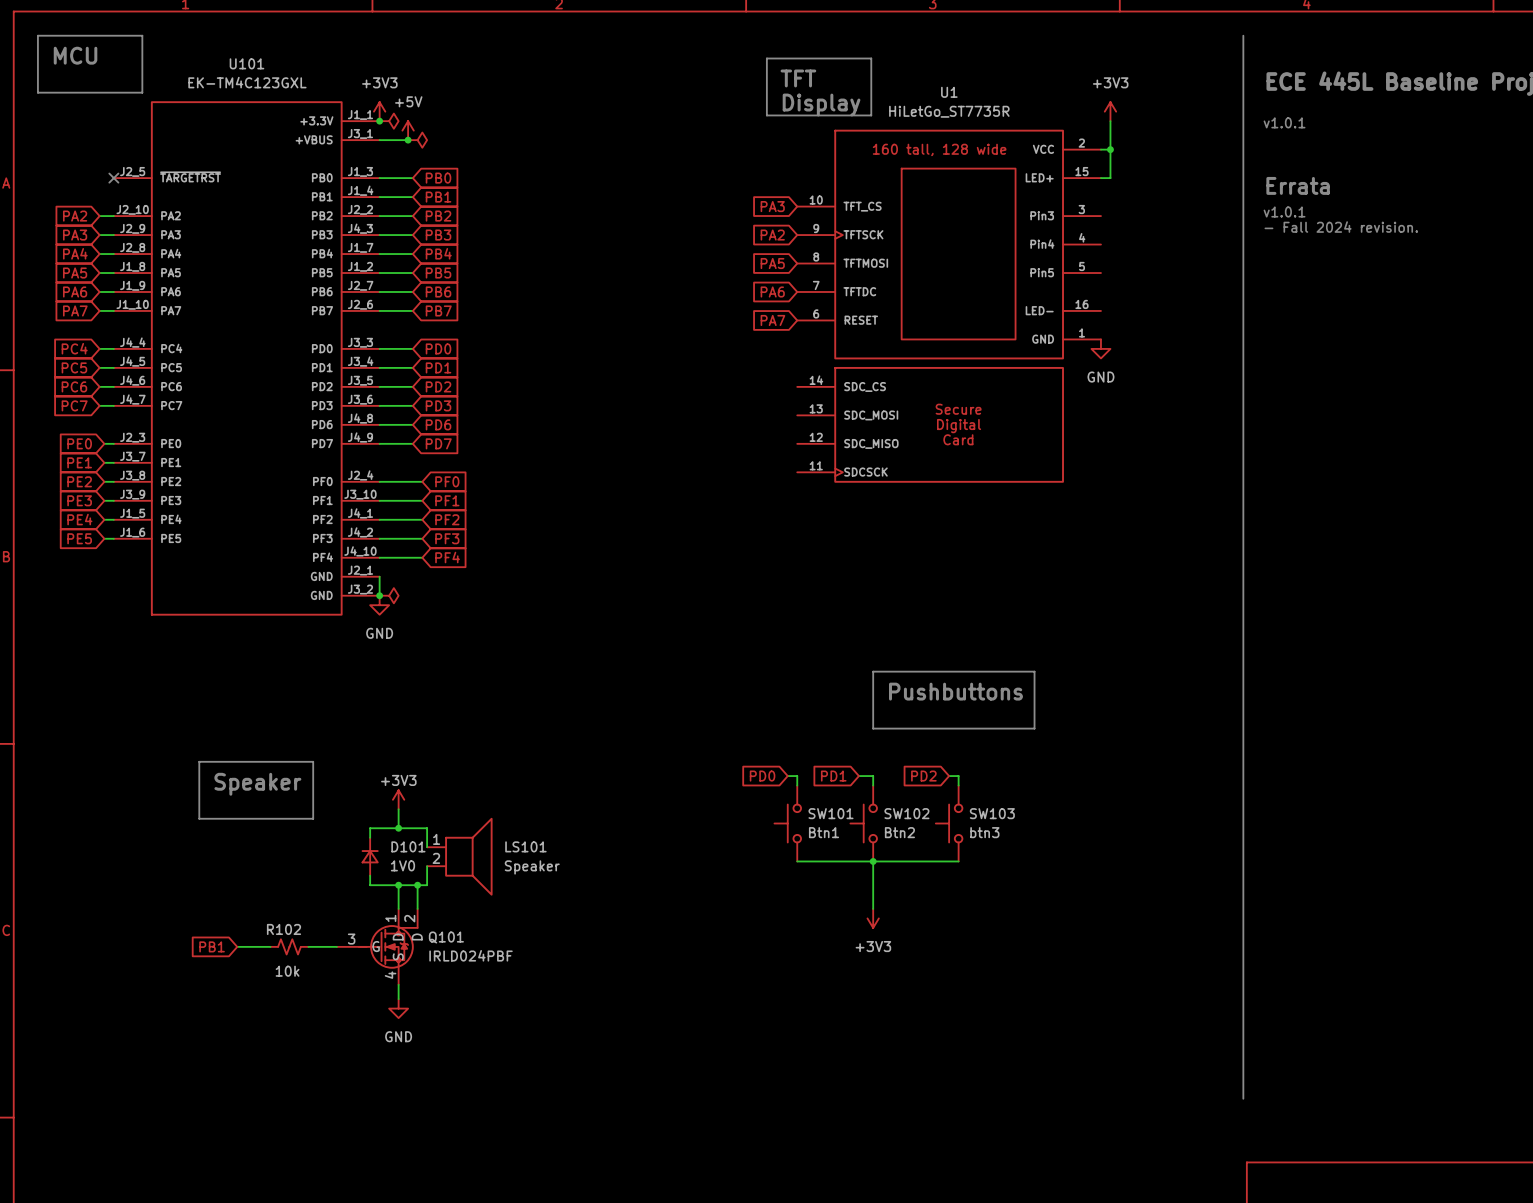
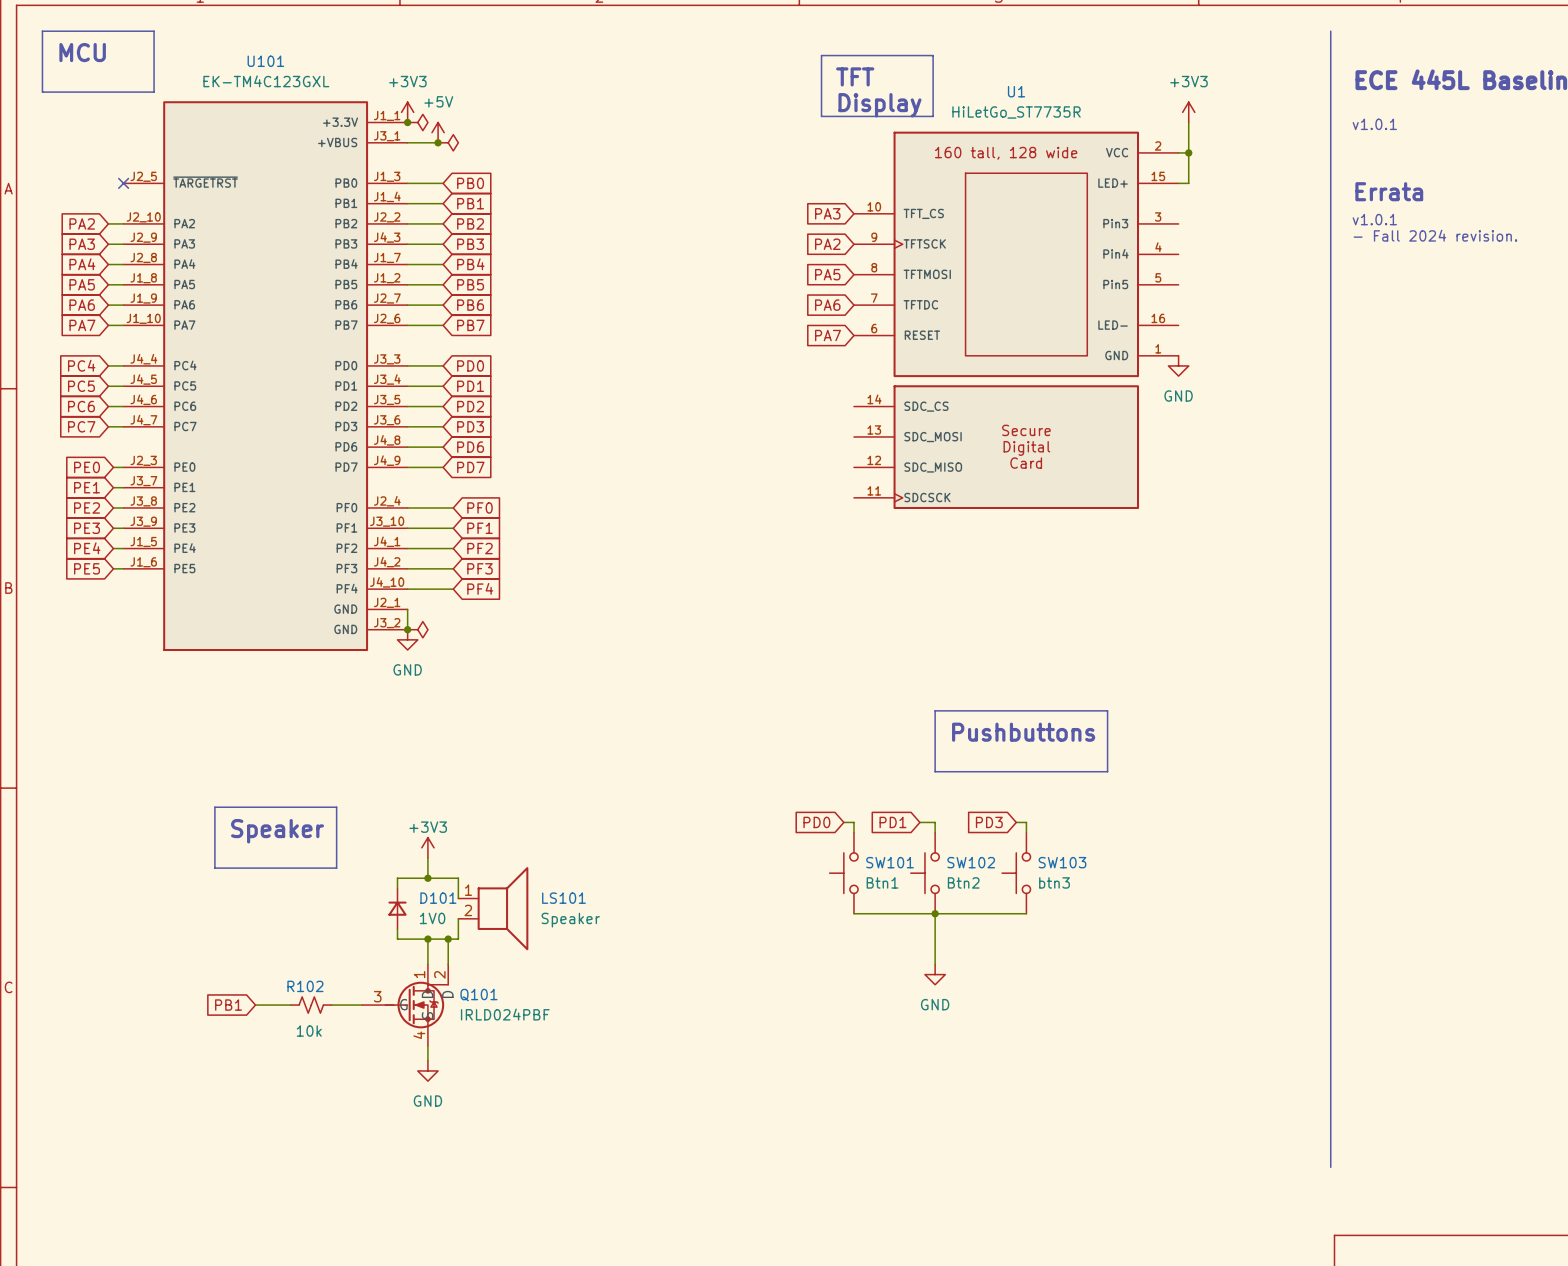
global label: PD2 (923, 776) -> PD3 (989, 822)
power symbol: +3V3 (873, 918) -> GND (935, 974)

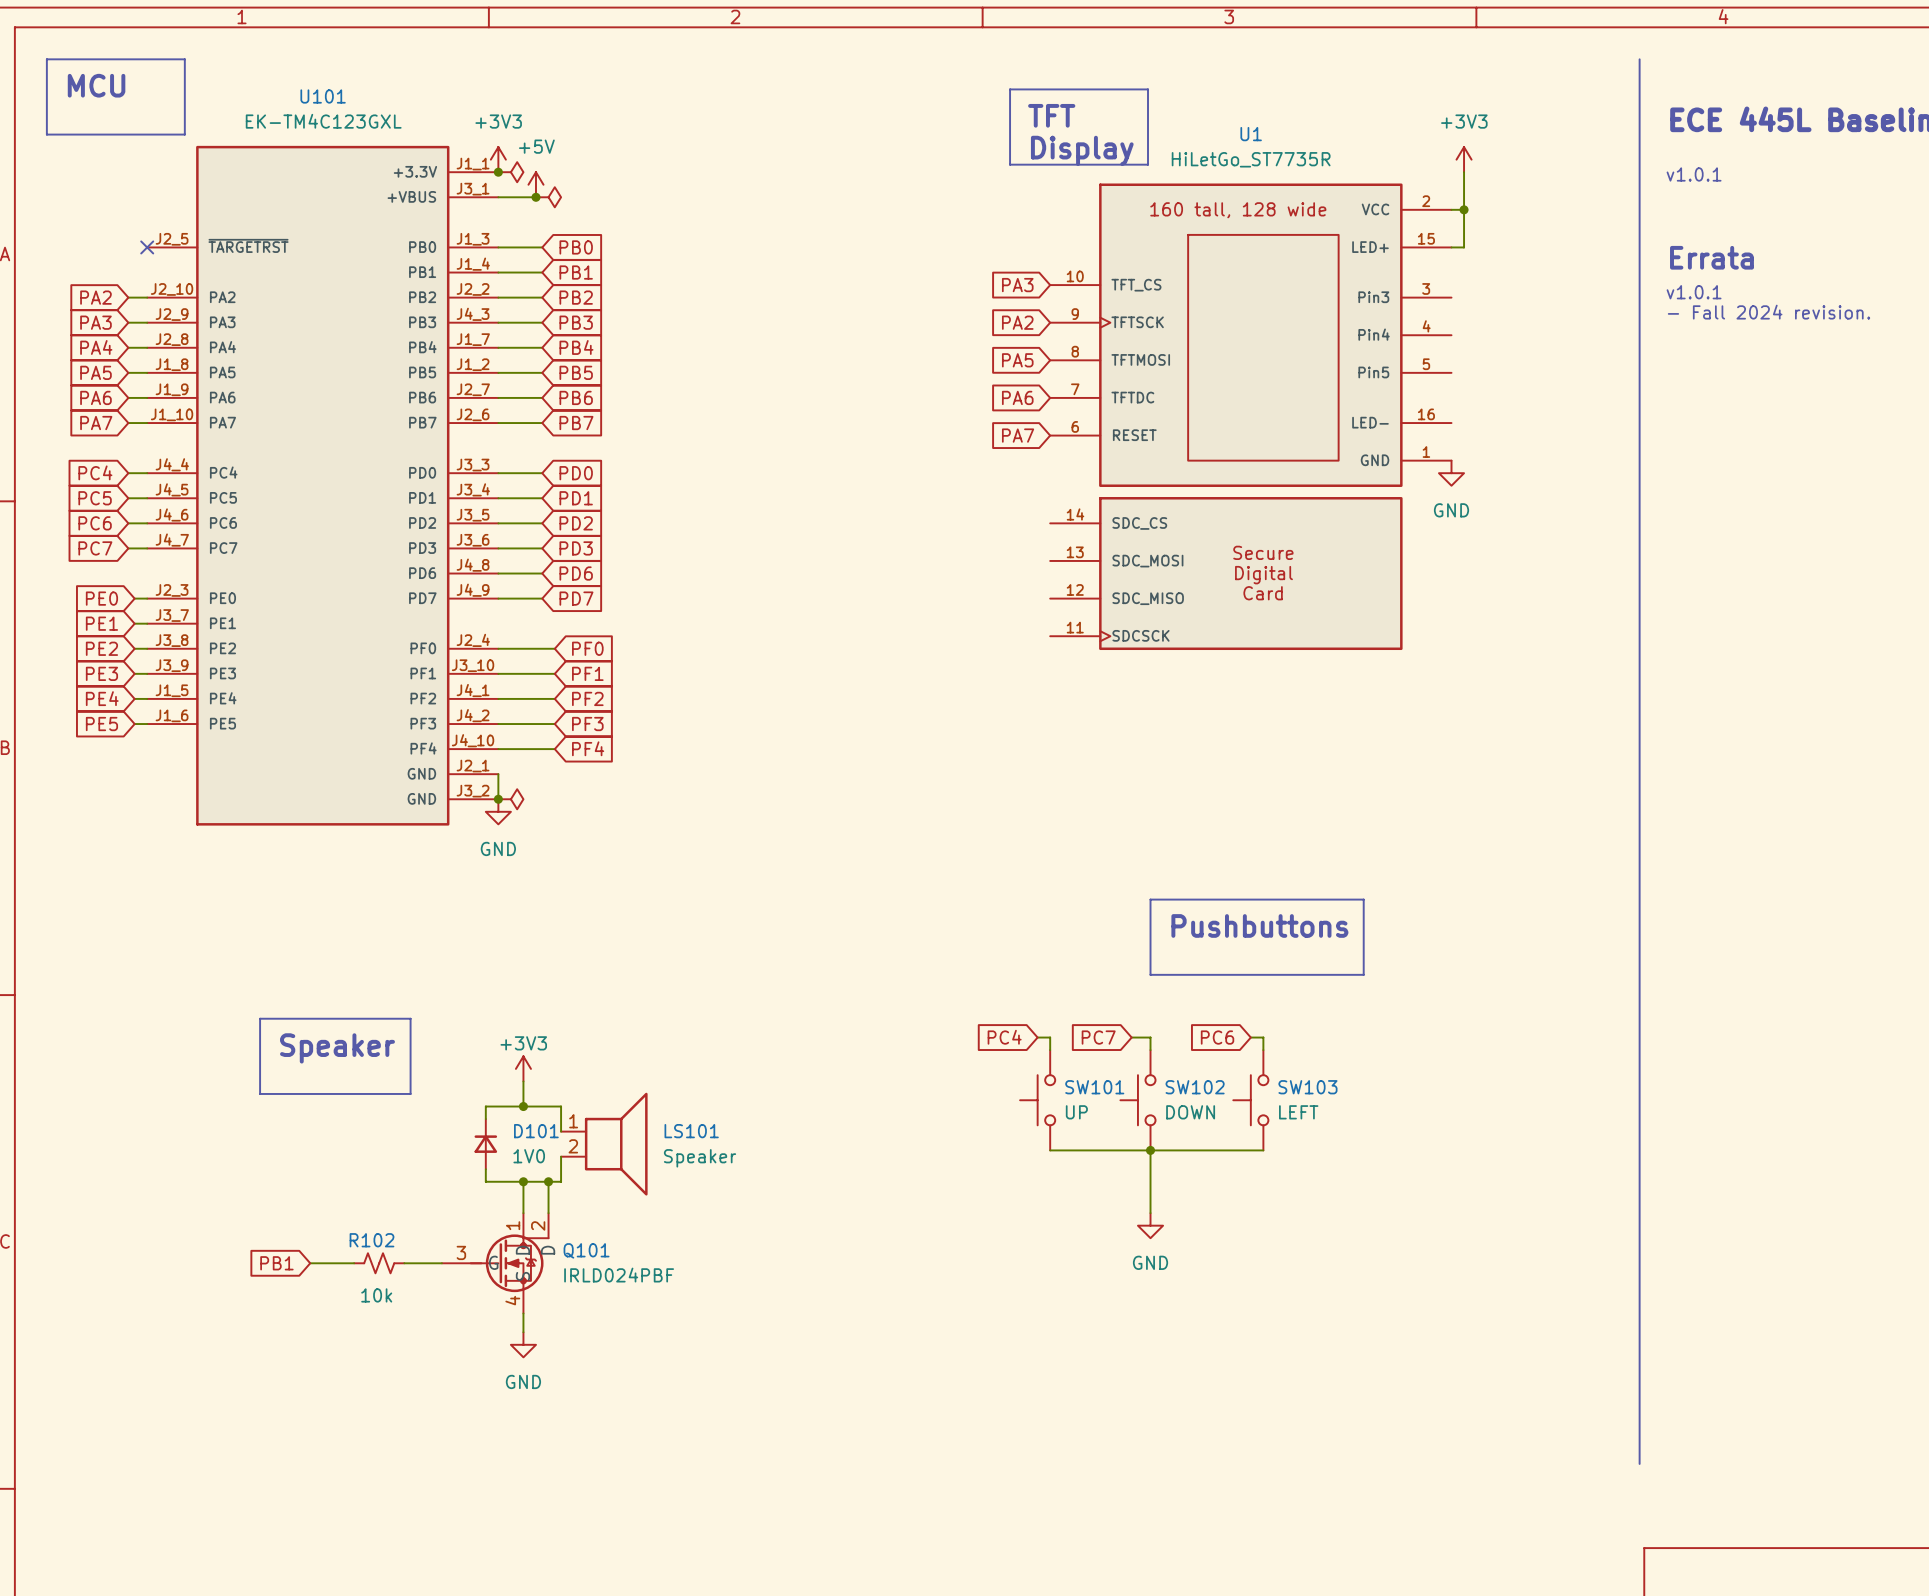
global label: PD0 (816, 822) -> PC4 (1004, 1037)
global label: PD1 (892, 822) -> PC7 (1098, 1037)
global label: PD3 (989, 822) -> PC6 (1217, 1037)
SW101 value: Btn1 (882, 882) -> UP (1076, 1112)
SW102 value: Btn2 (963, 882) -> DOWN (1190, 1112)
SW103 value: btn3 (1054, 882) -> LEFT (1298, 1112)

